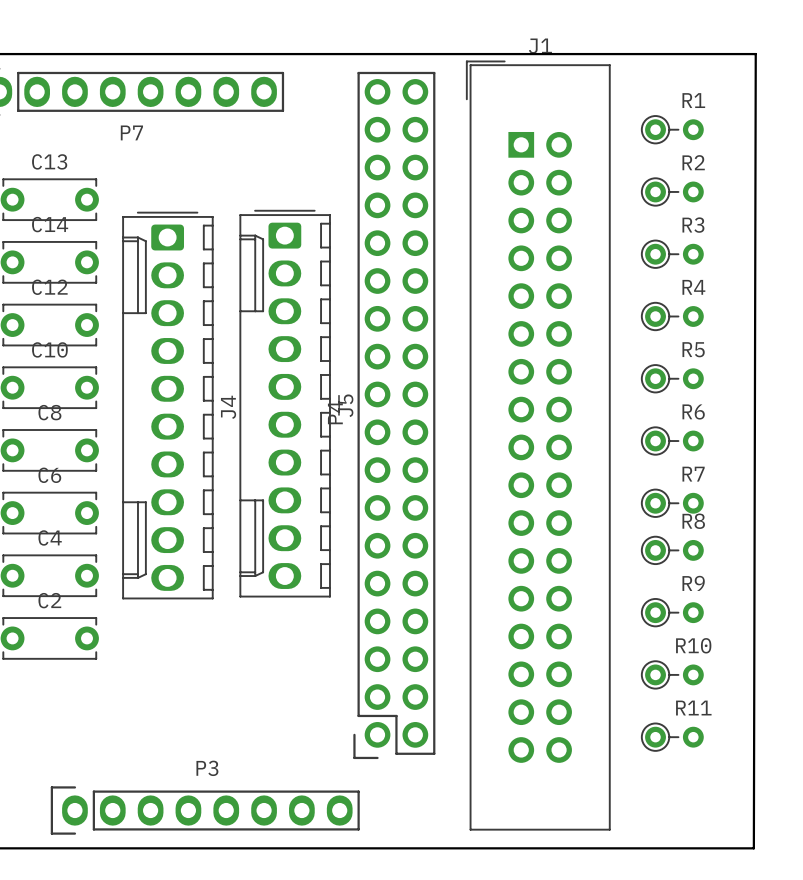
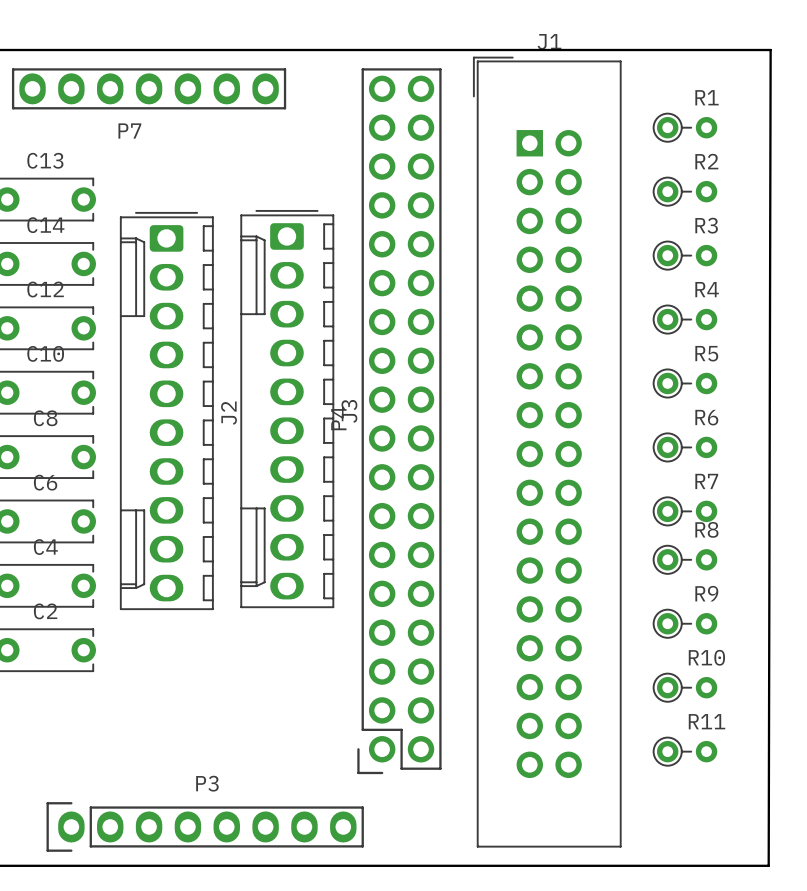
J5 name: J5 (345, 405) -> J3 (349, 411)
J4 name: J4 (228, 407) -> J2 (228, 413)

